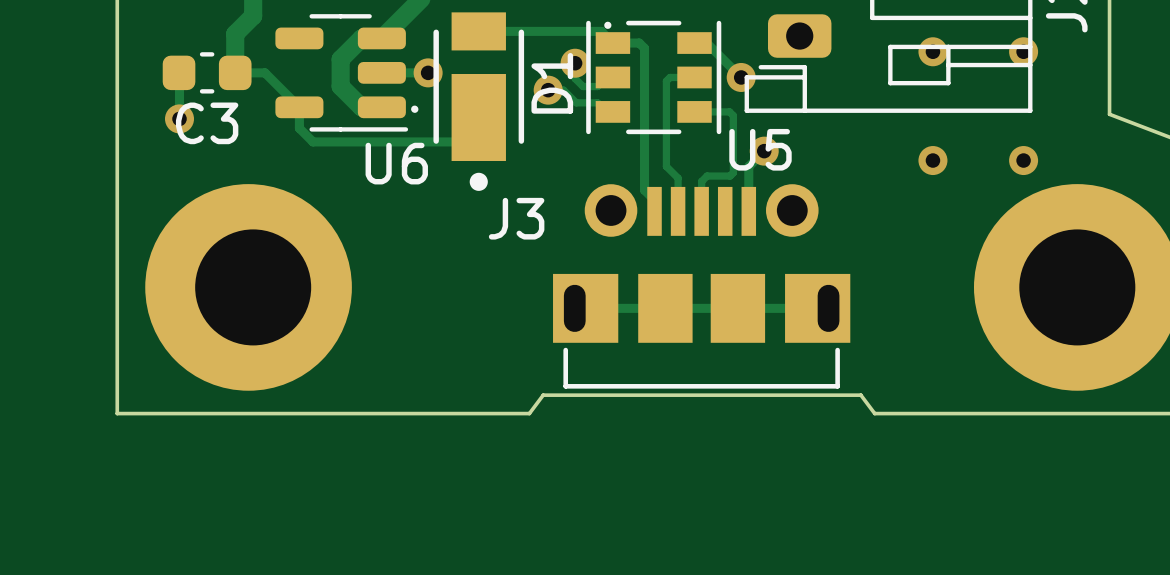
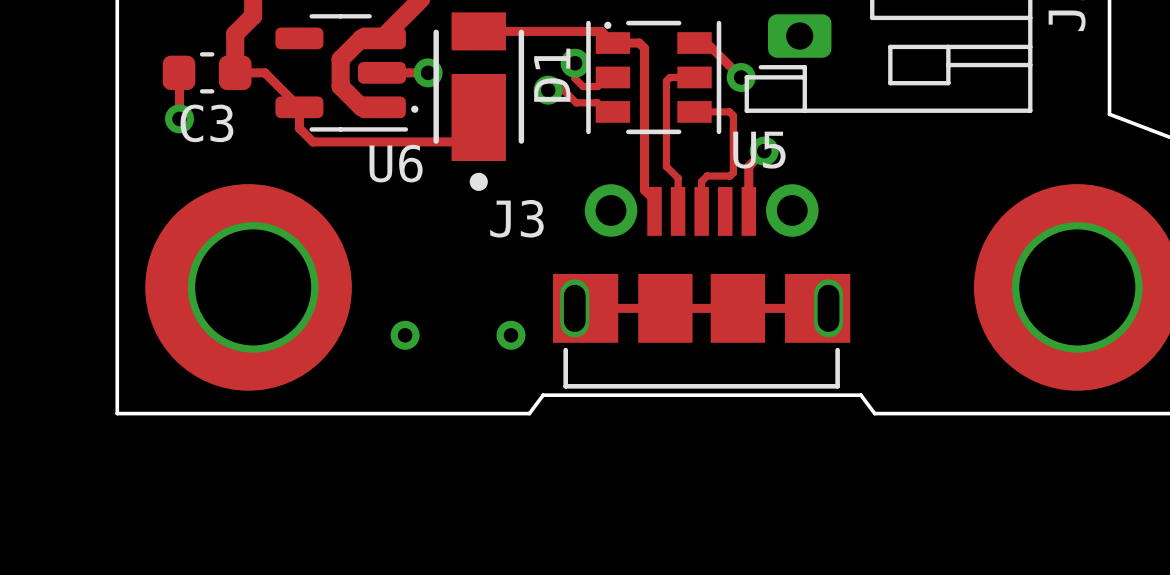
via: (932, 51) -> none
via: (1023, 51) -> none
via: (932, 160) -> none
via: (1023, 160) -> none
via: none -> (405, 335)
via: none -> (511, 335)

